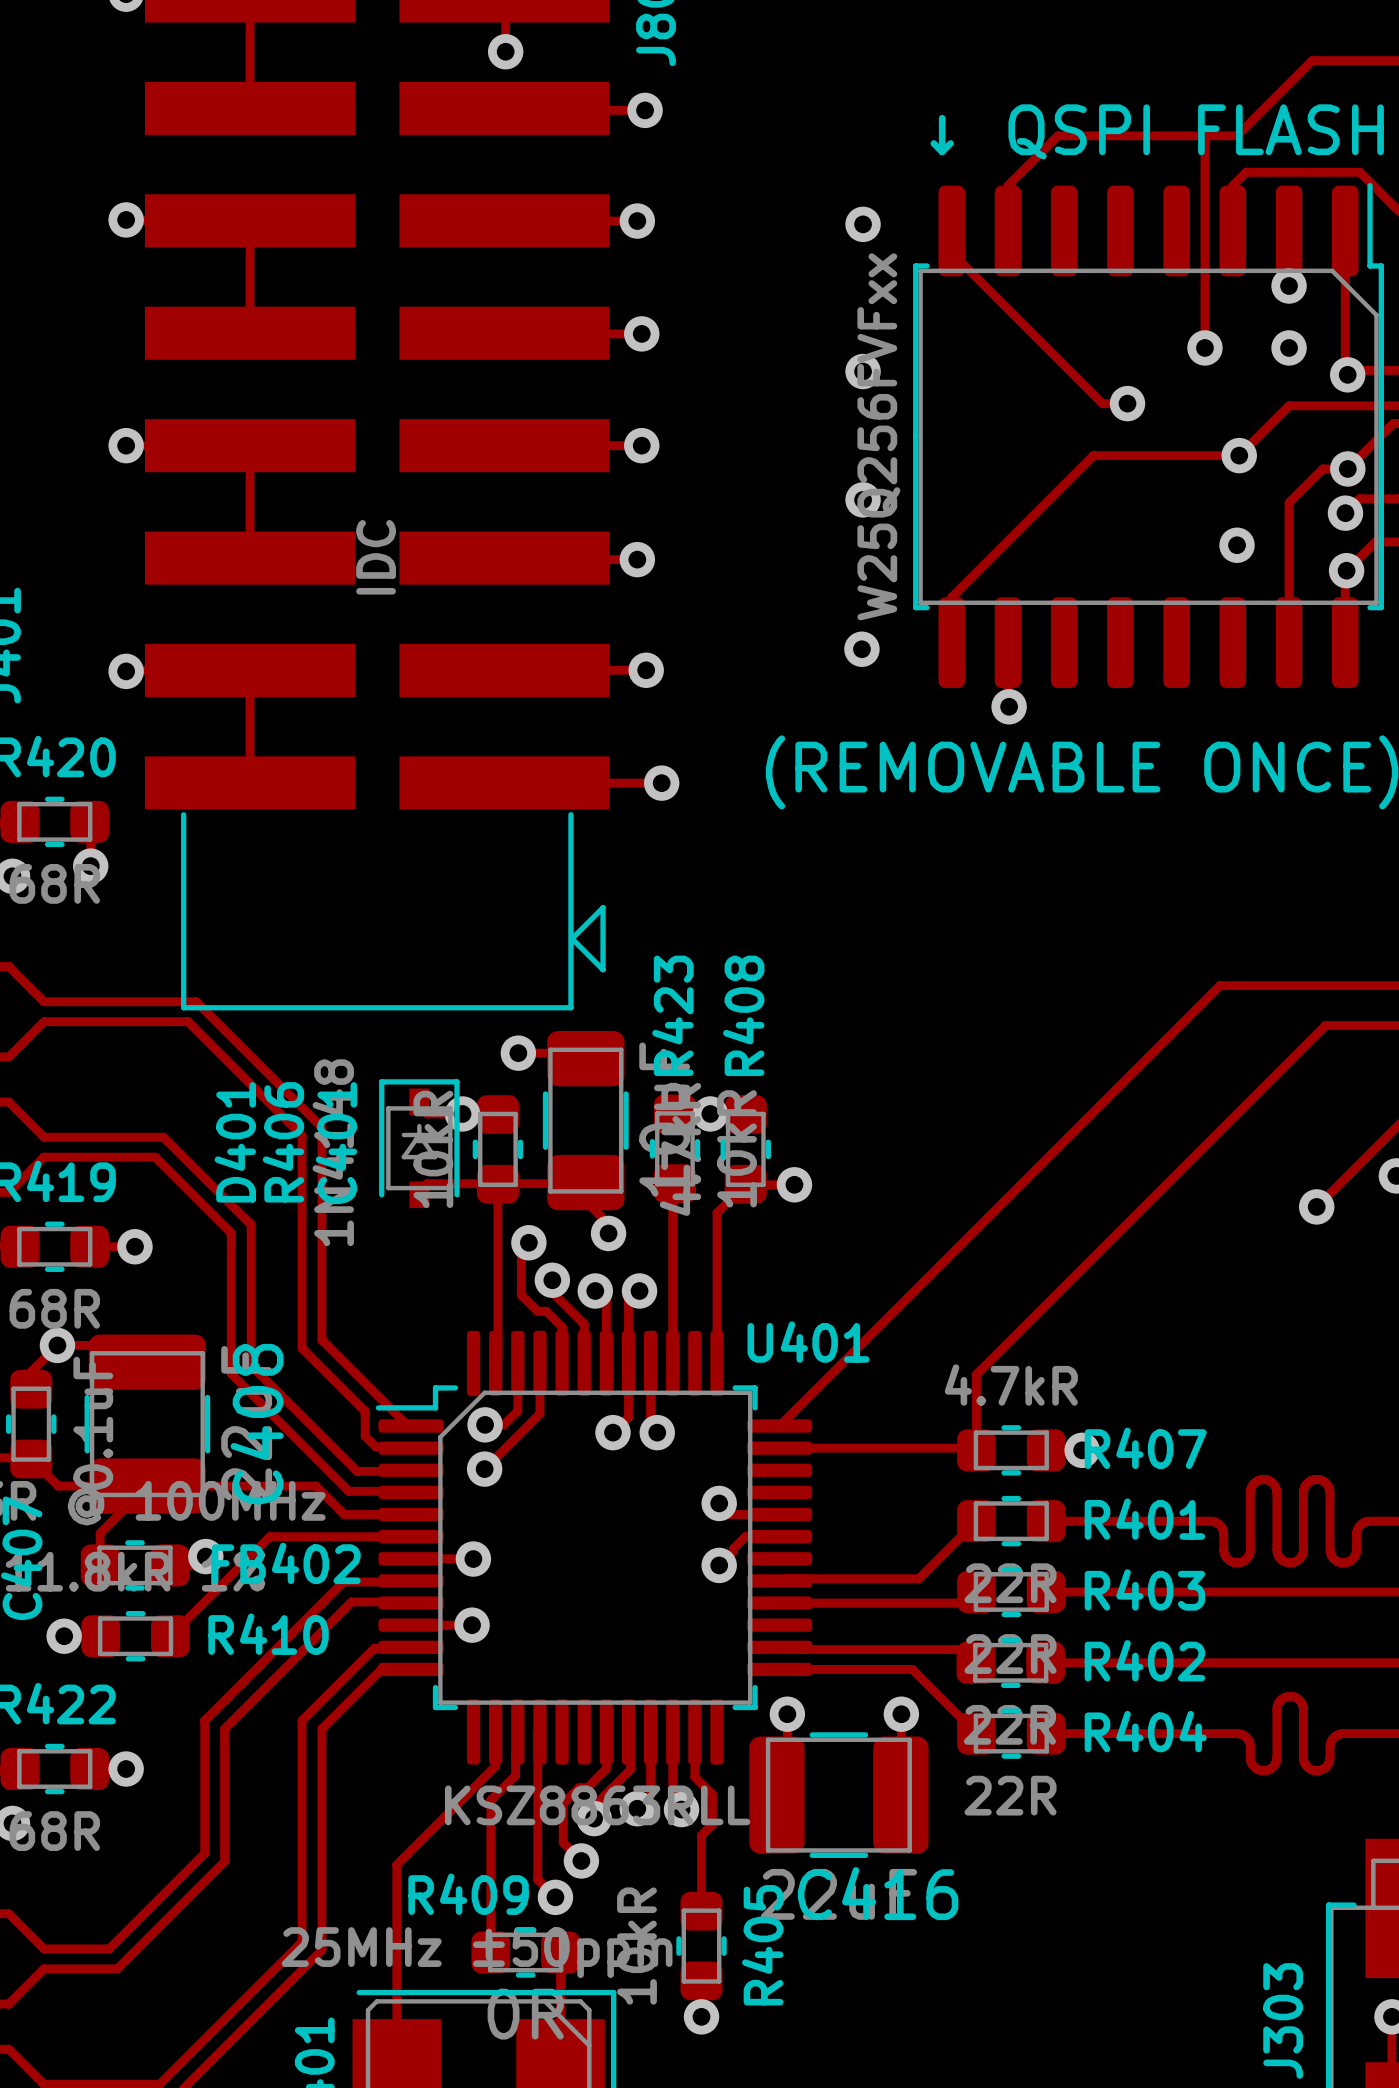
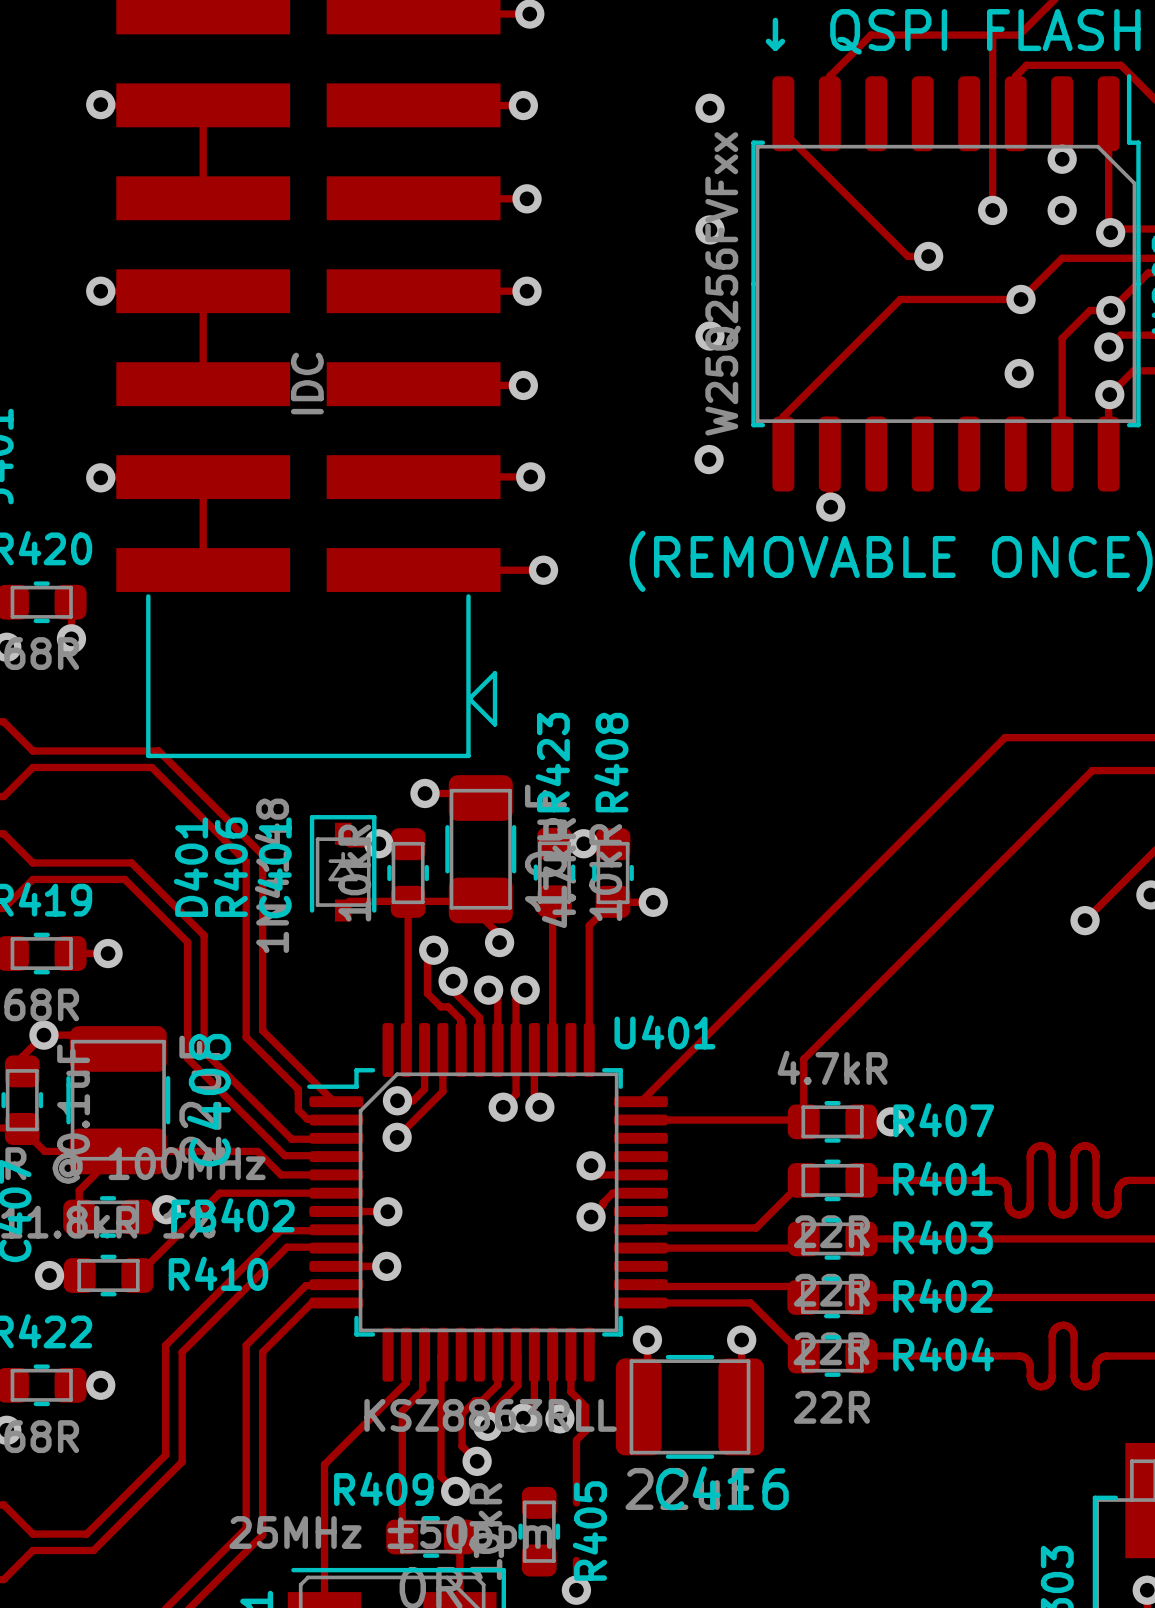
R405 position: (701, 1946) -> (539, 1531)

